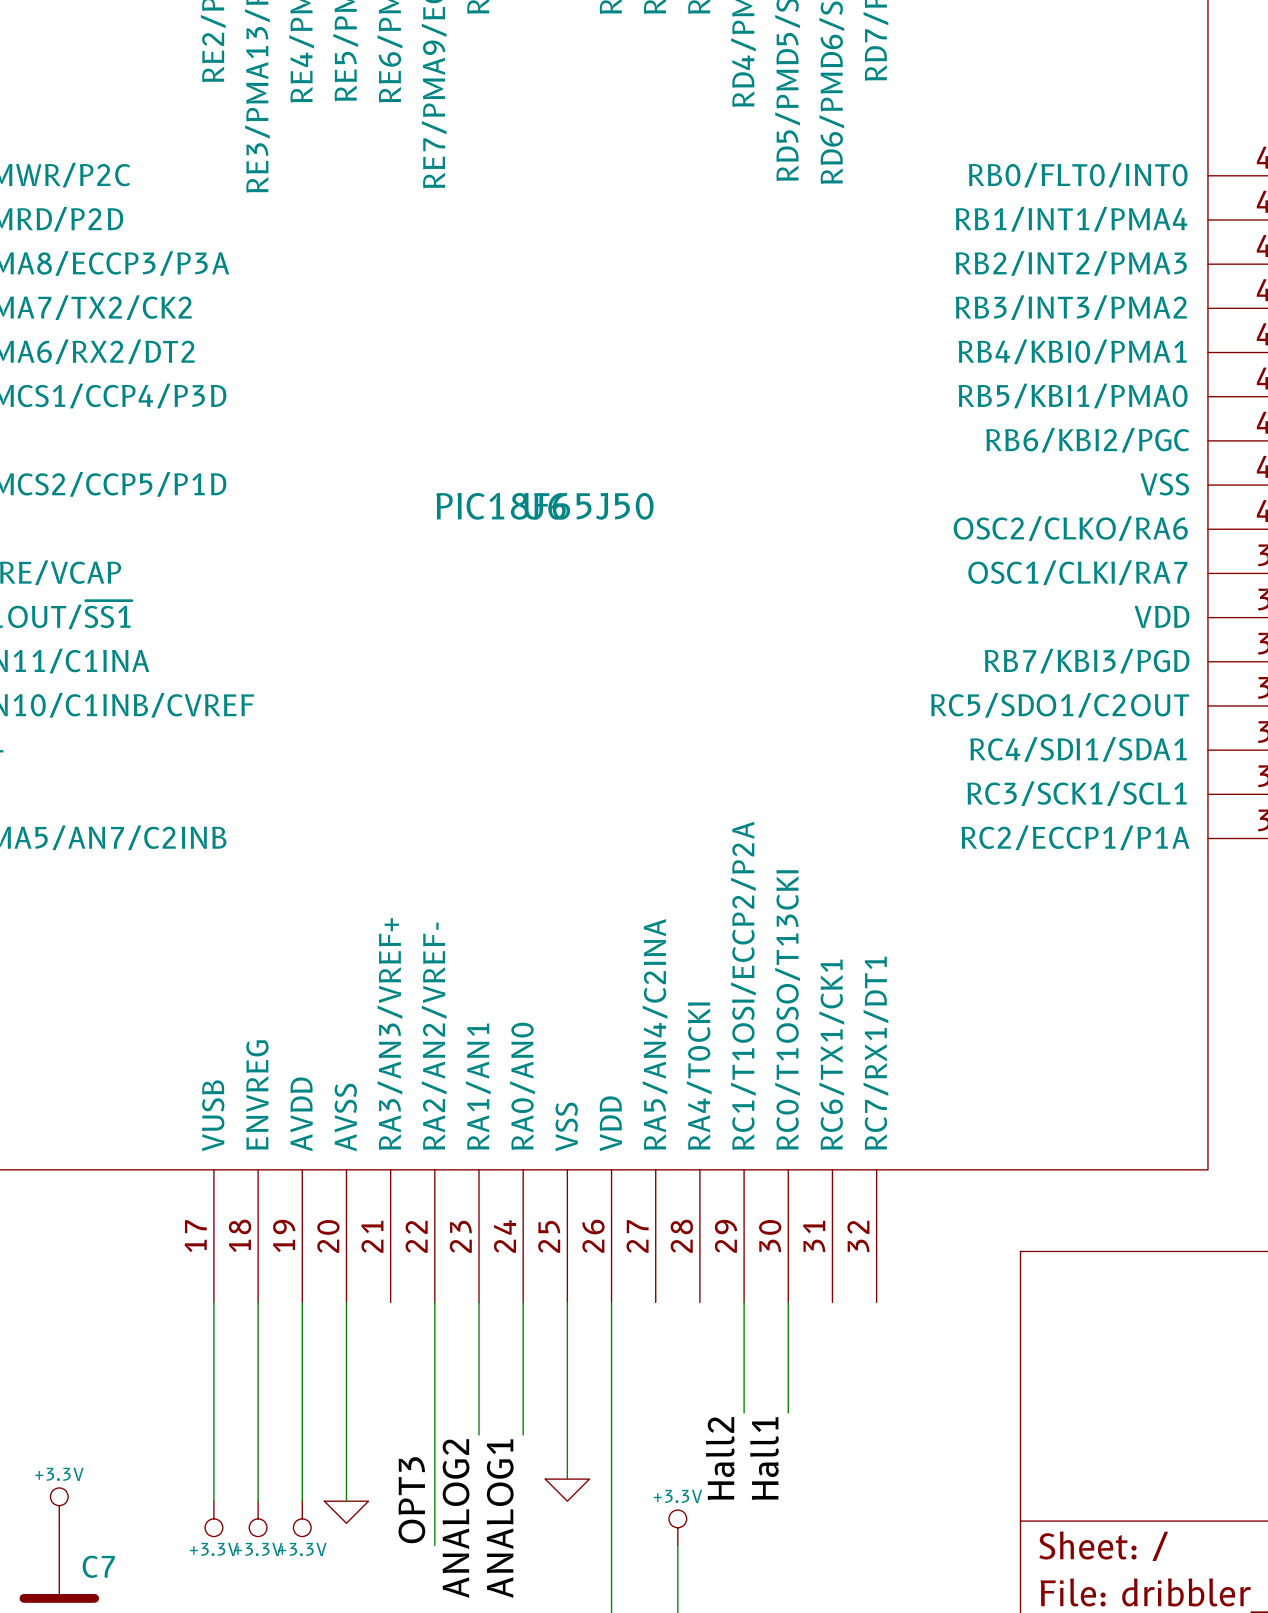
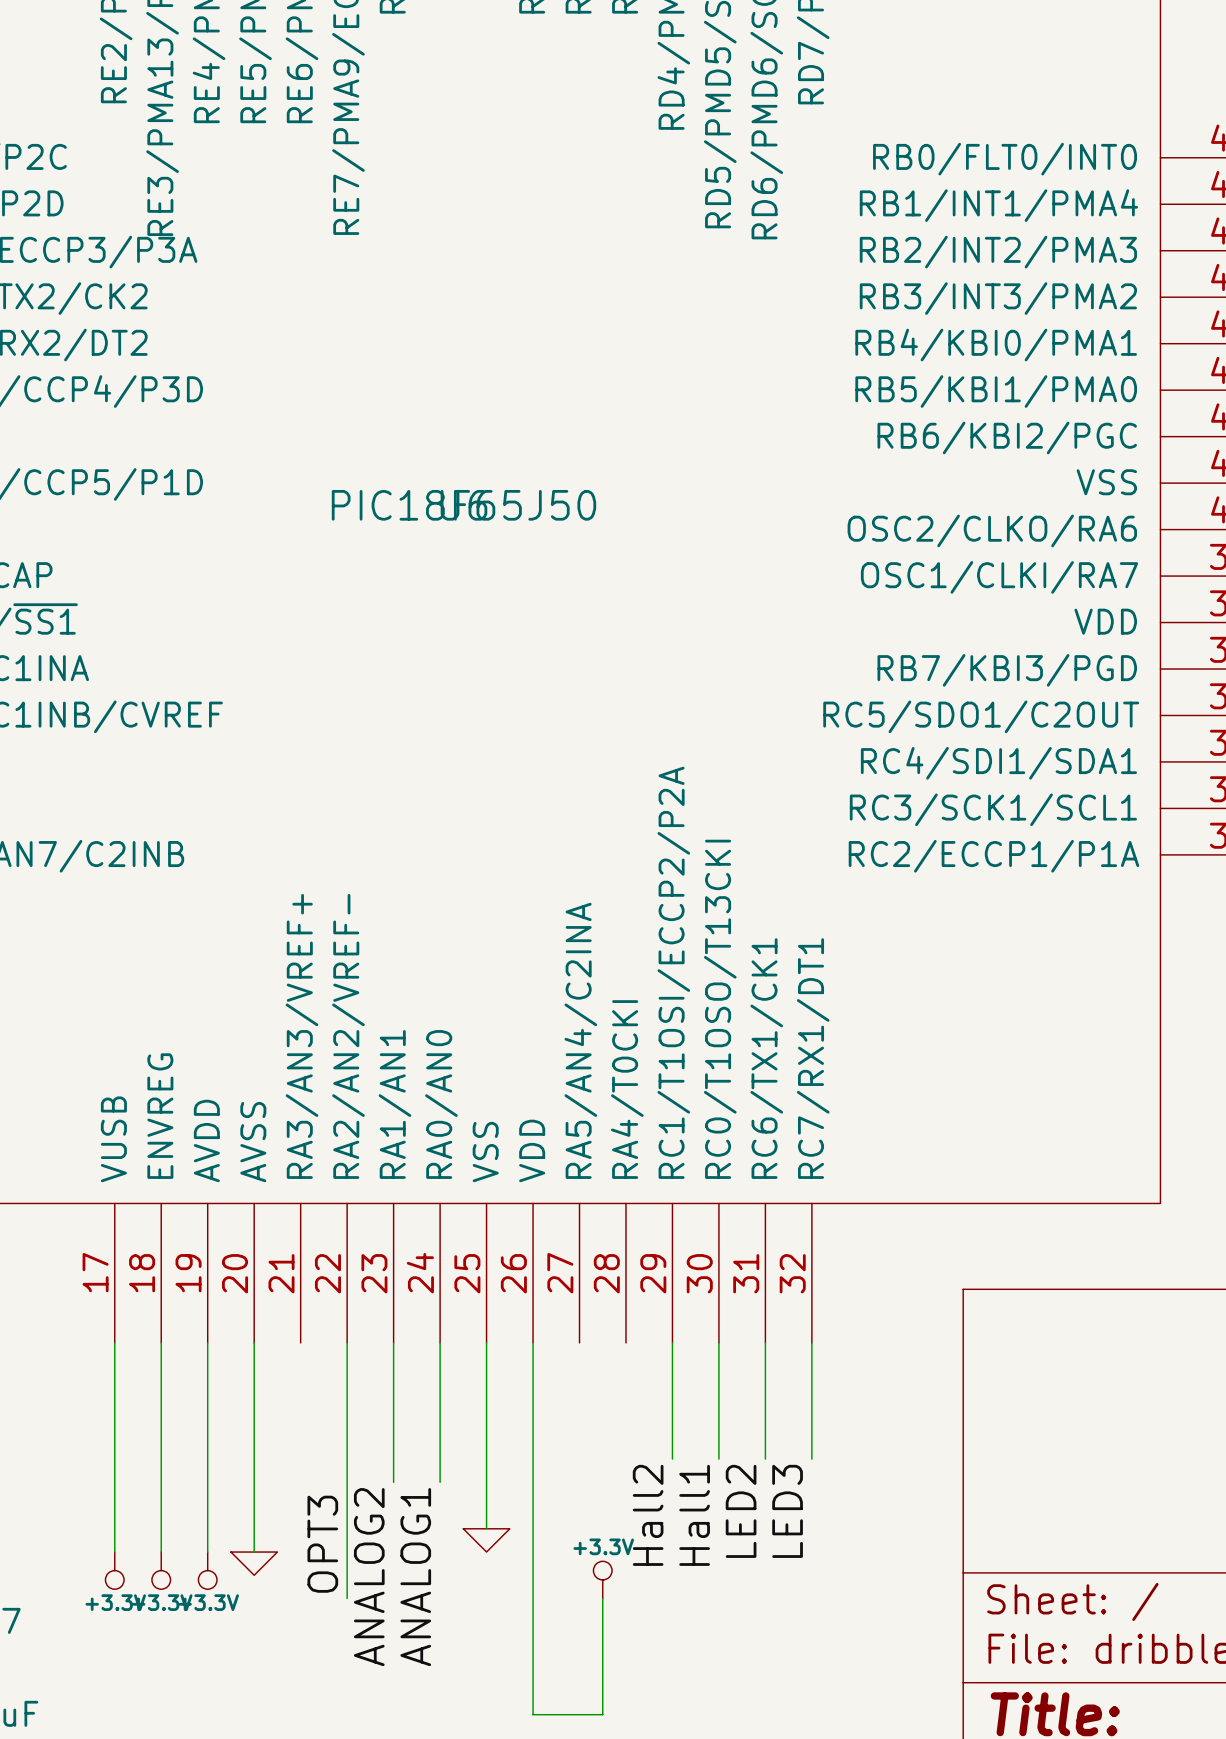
wire: none -> (765, 1342) (765, 1459)
wire: none -> (811, 1342) (811, 1459)
label: none -> LED2 (741, 1511)
label: none -> LED3 (787, 1511)

